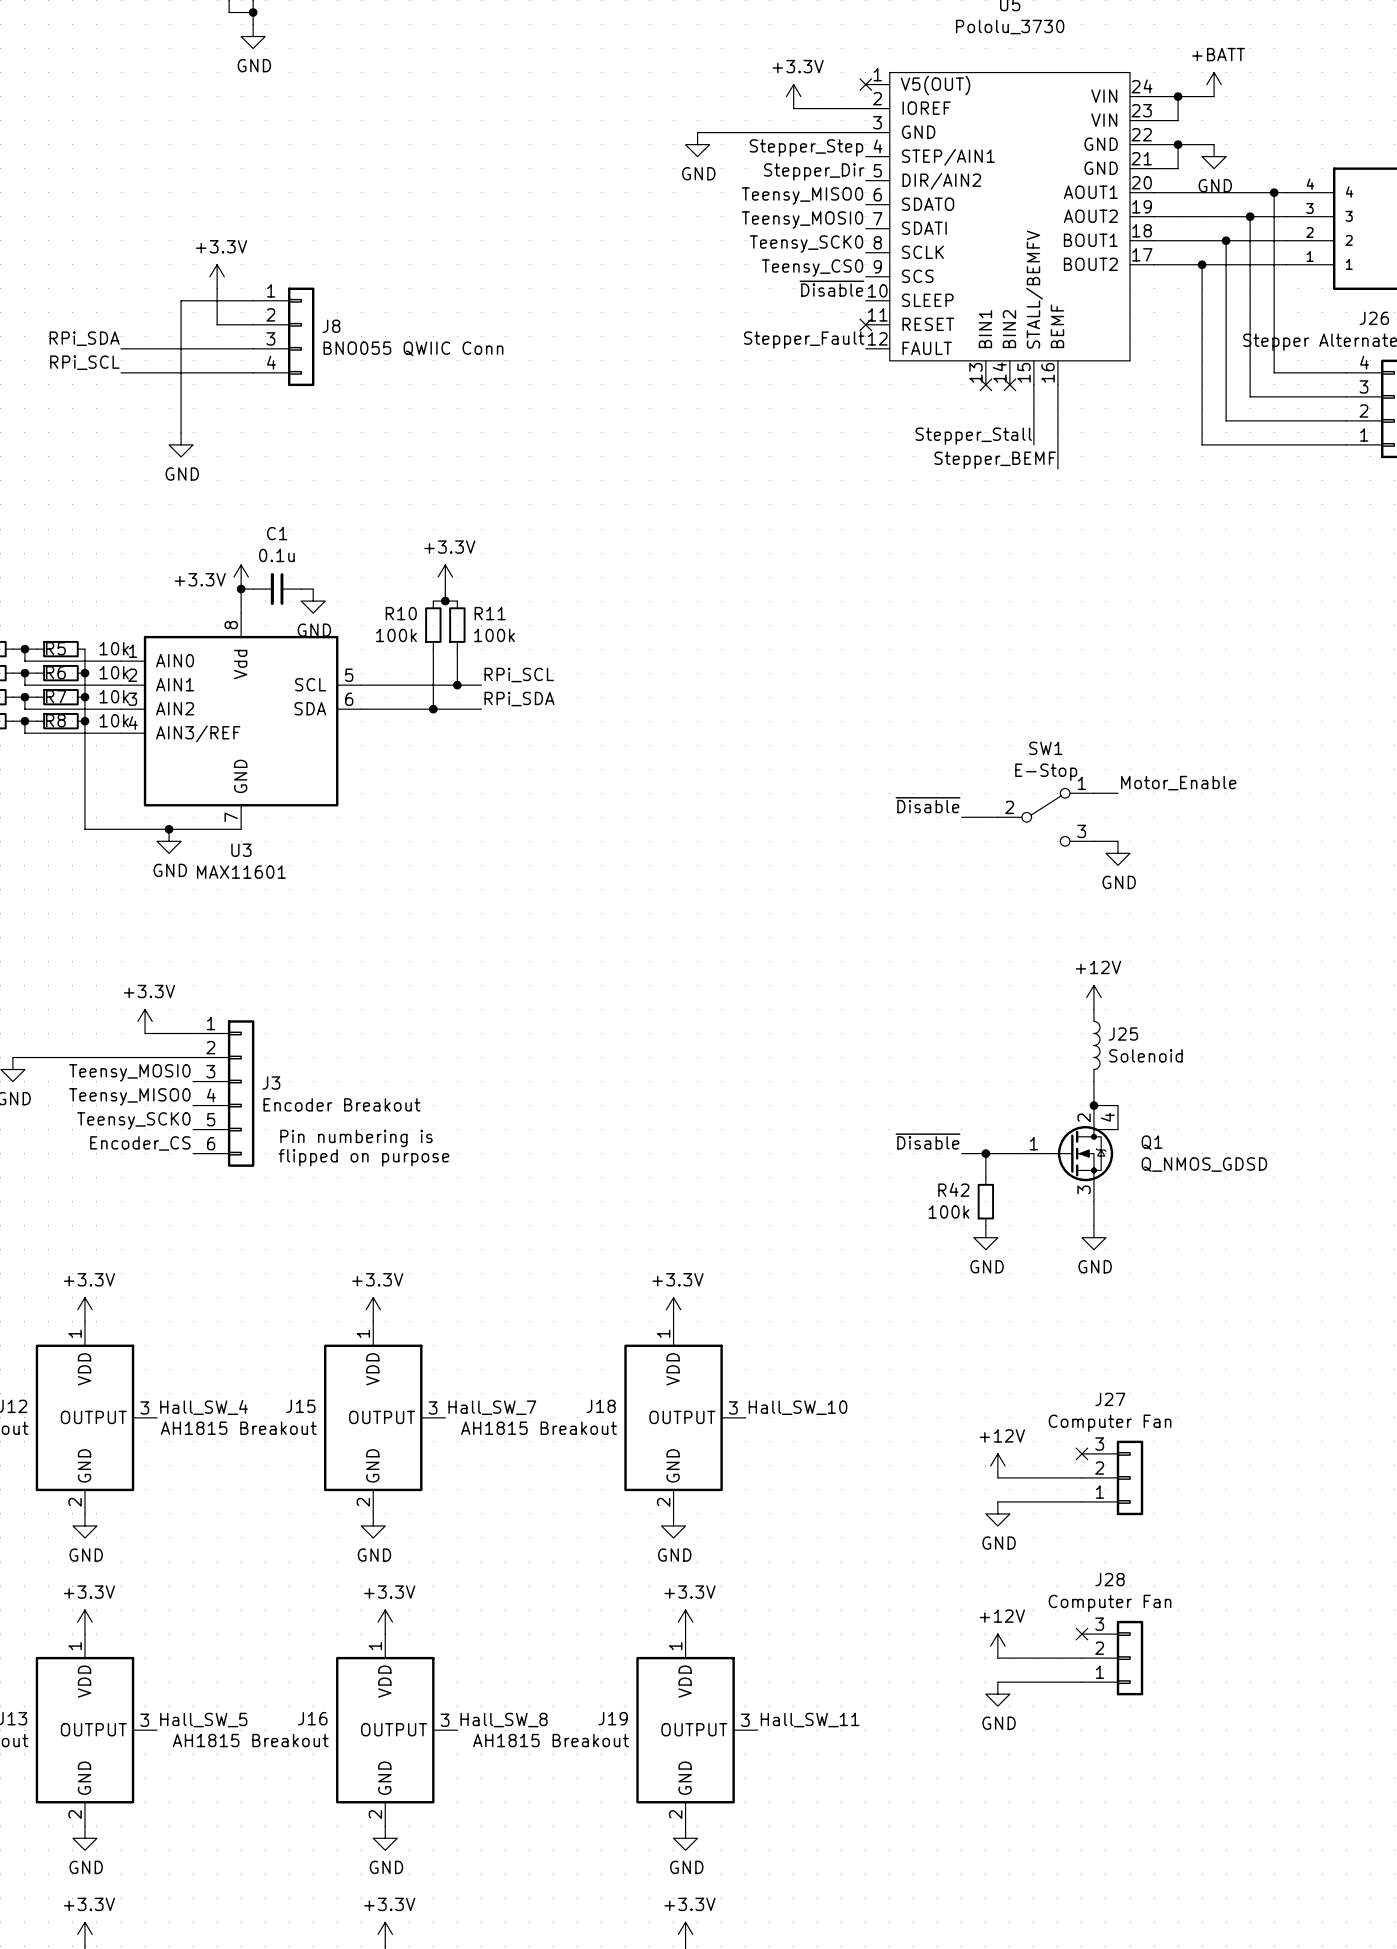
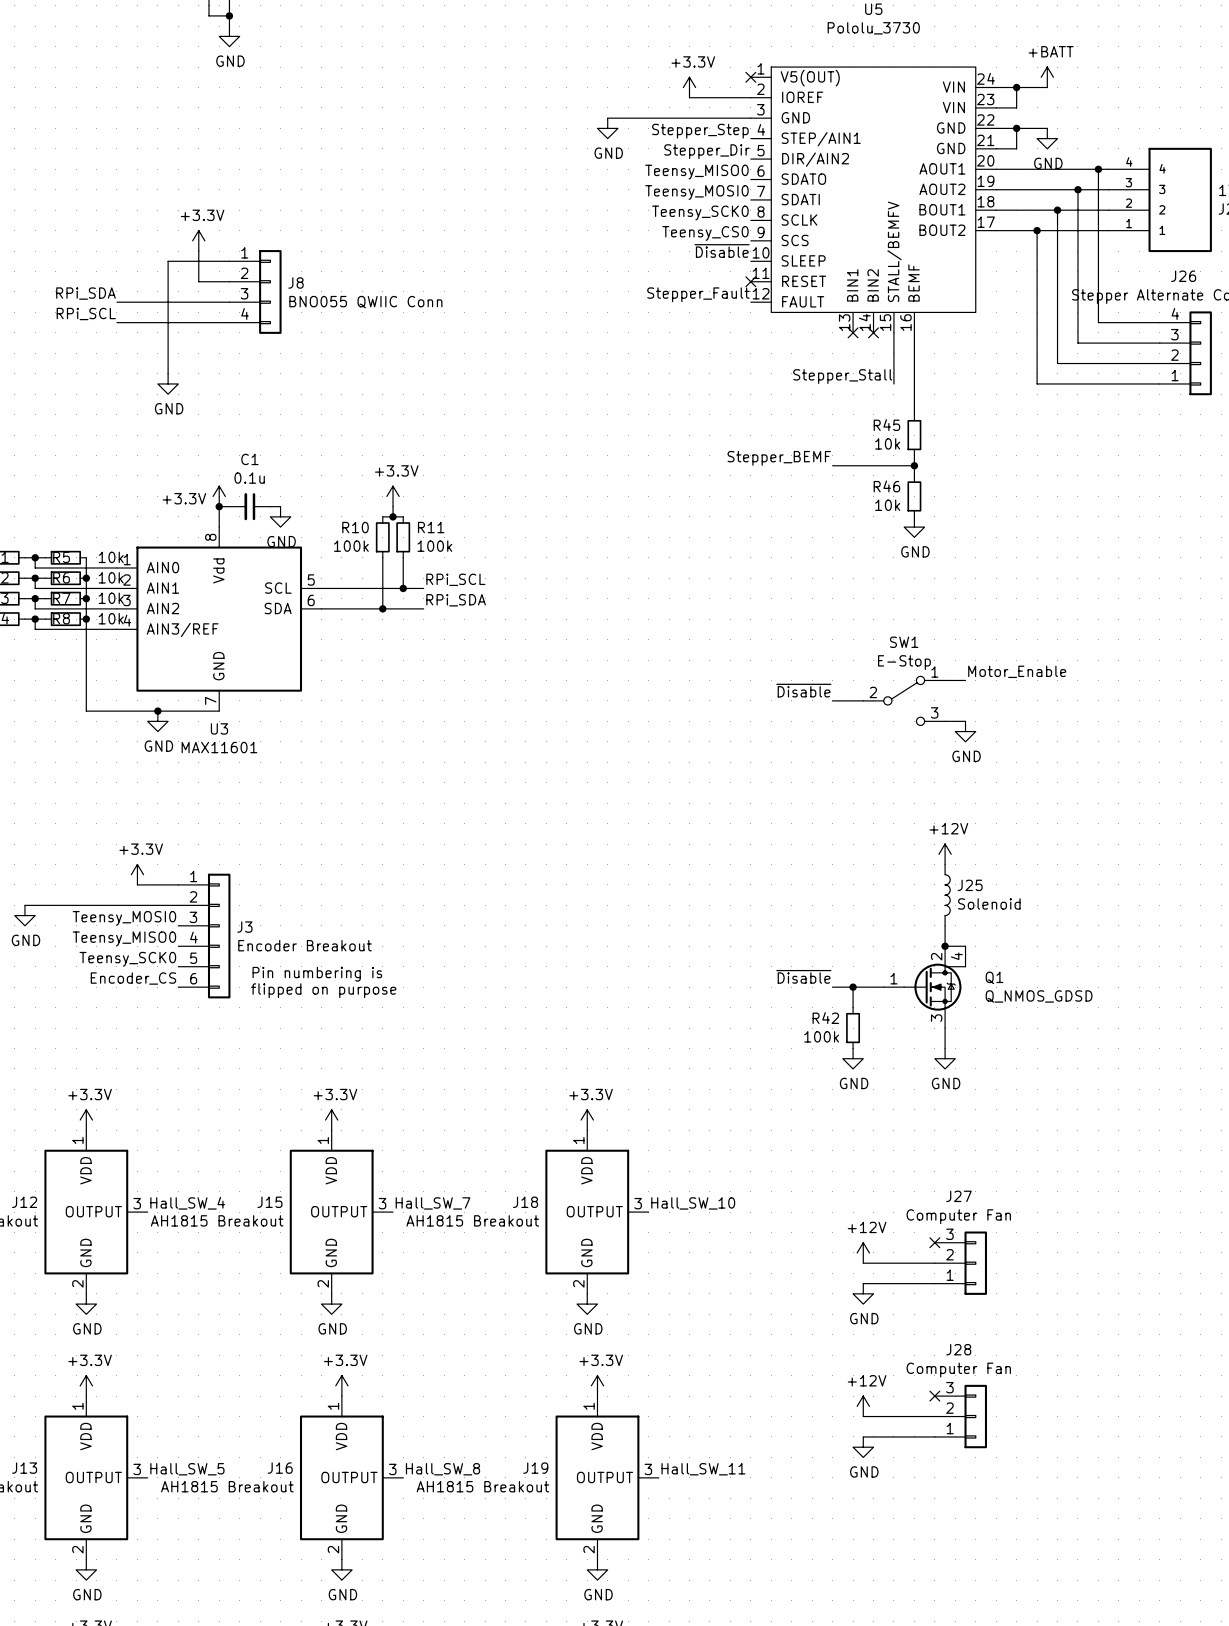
label position: Stepper_BEMF (995, 460) -> Stepper_BEMF (779, 458)
wire: none -> (914, 404) (914, 414)
R45: none -> 10k (914, 435)
wire: none -> (914, 455) (914, 475)
wire: none -> (832, 465) (914, 465)
junction: none -> (914, 465)
R46: none -> 10k (914, 496)
power symbol: none -> GND (914, 527)

